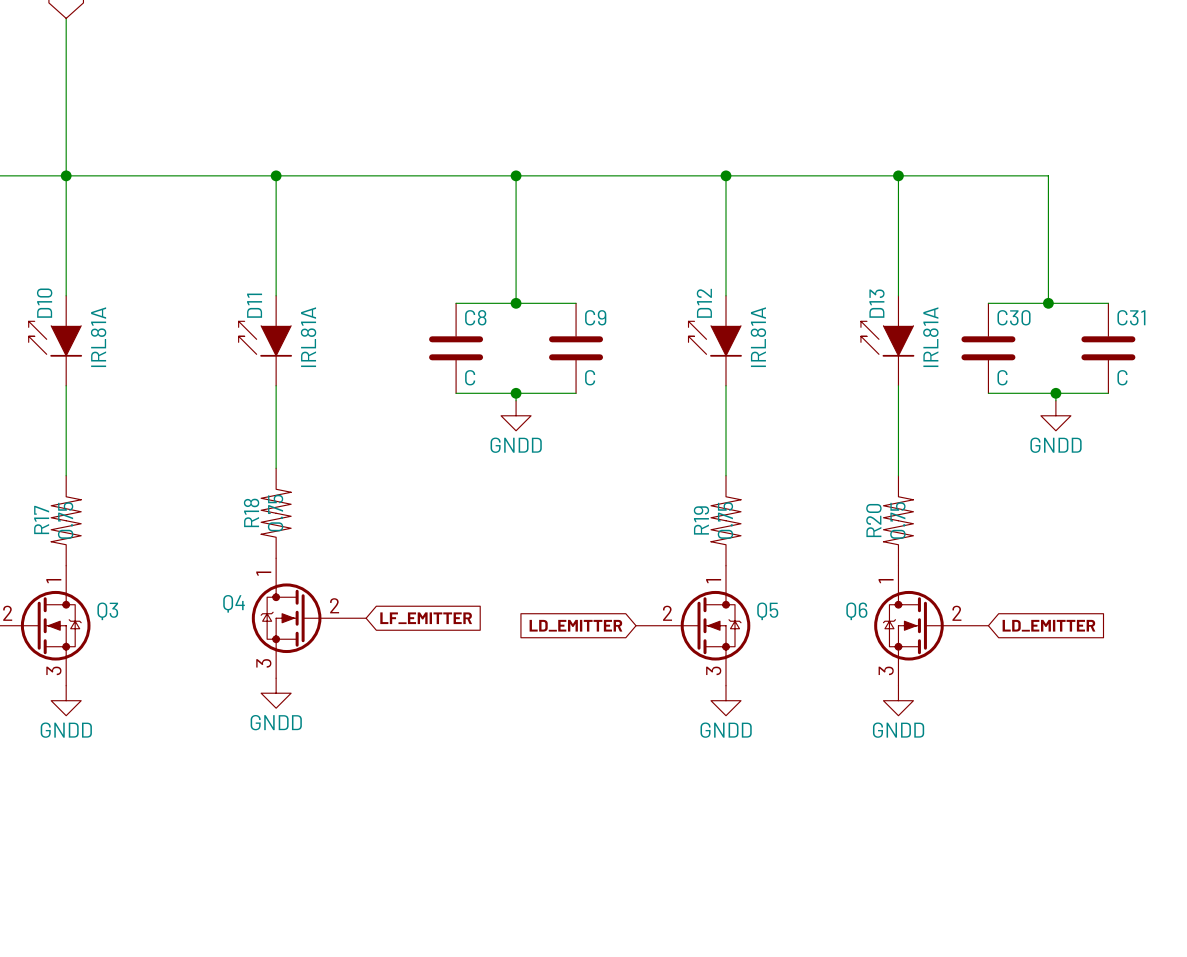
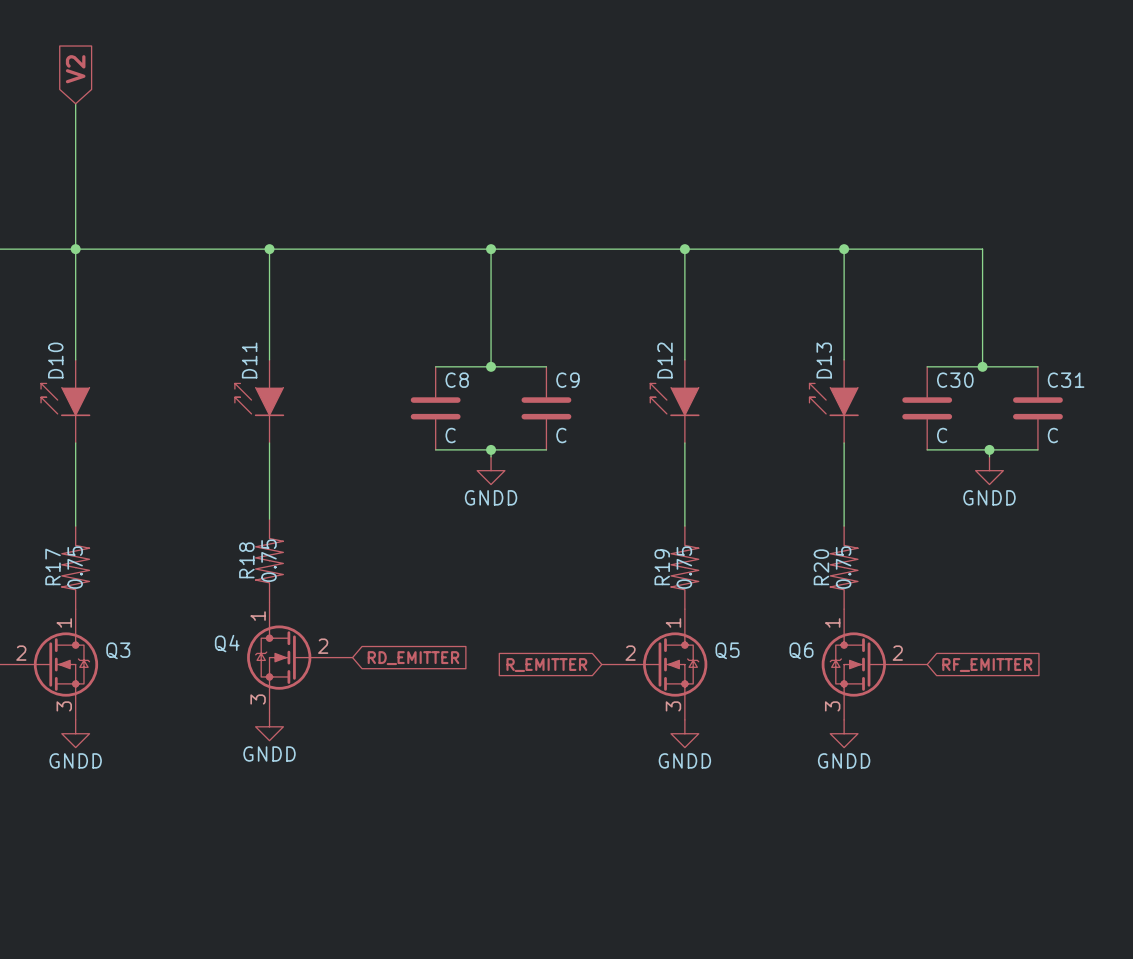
D10 value: IRL81A (98, 337) -> none
D11 value: IRL81A (308, 337) -> none
D12 value: IRL81A (758, 337) -> none
D13 value: IRL81A (930, 337) -> none
global label: LF_EMITTER (426, 618) -> RD_EMITTER (413, 658)
global label: LD_EMITTER (575, 625) -> R_EMITTER (546, 665)
global label: LD_EMITTER (1048, 625) -> RF_EMITTER (987, 665)

